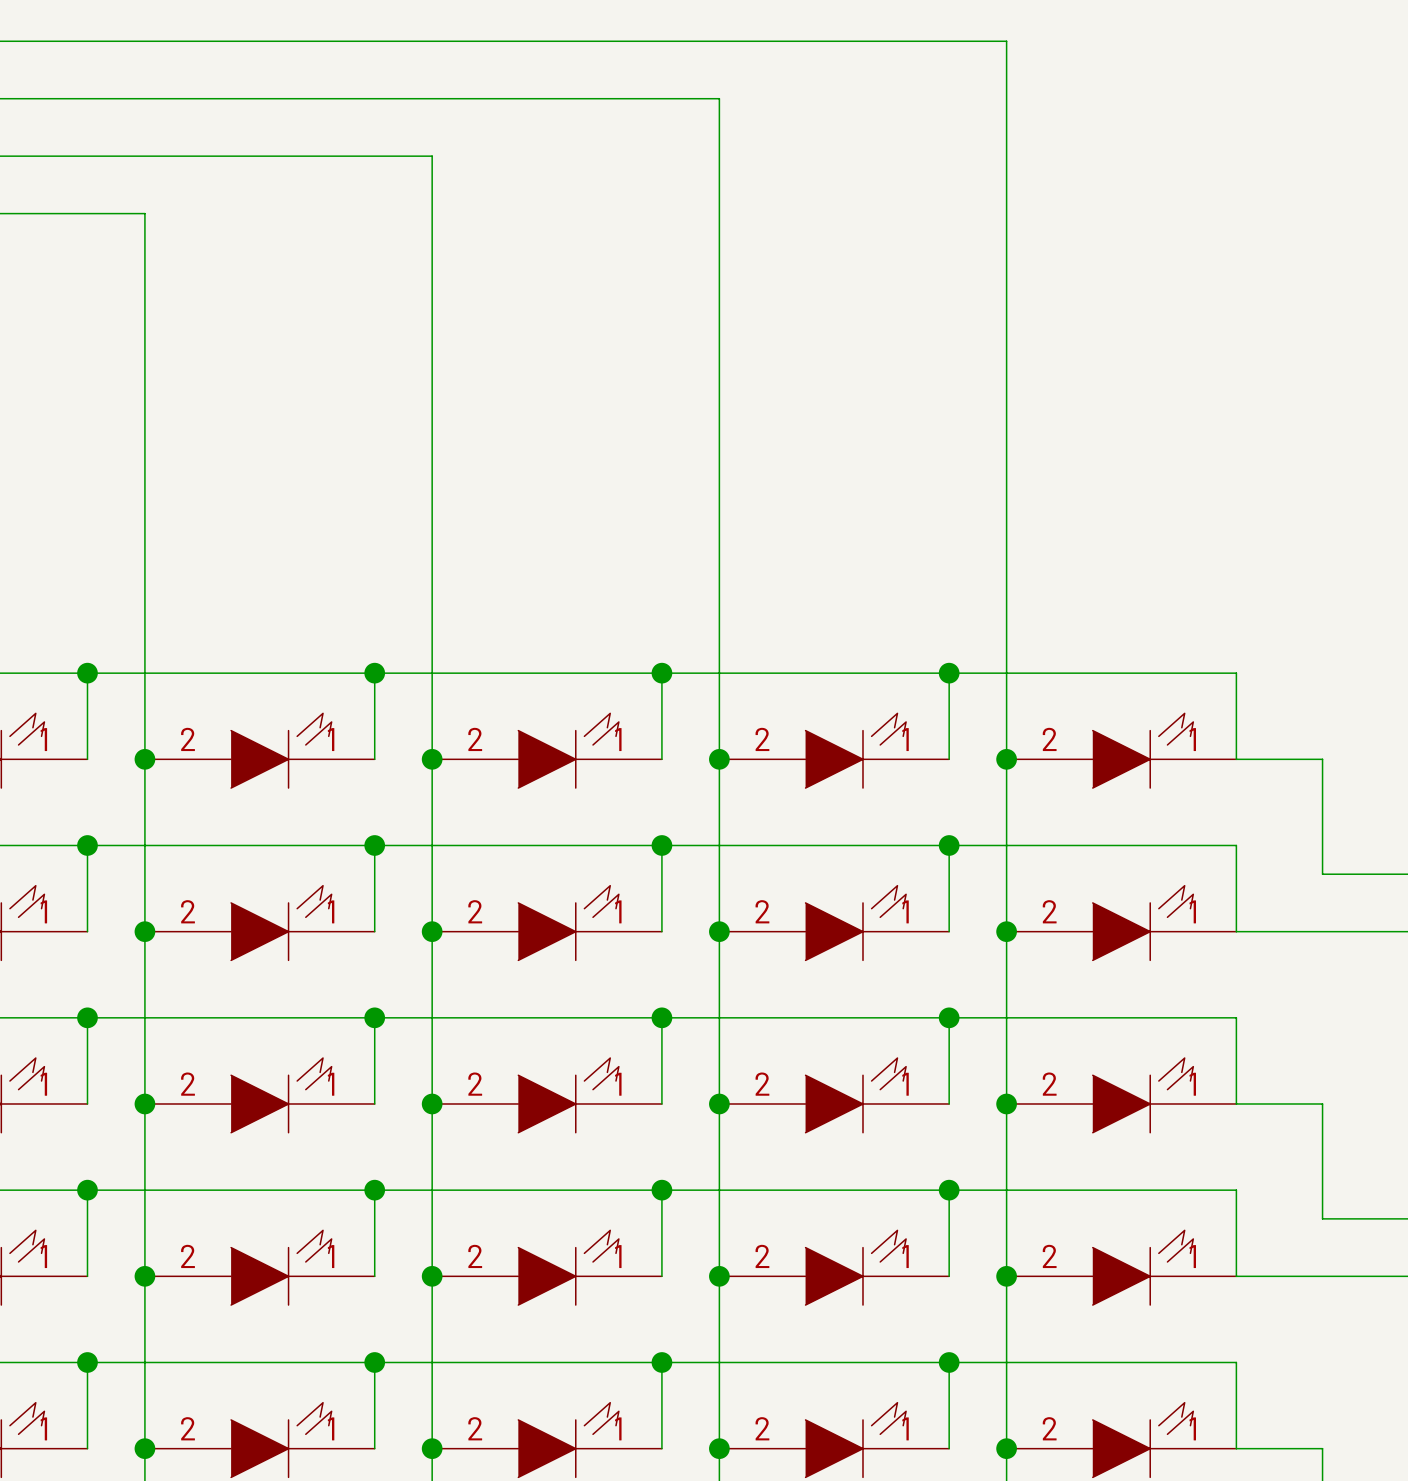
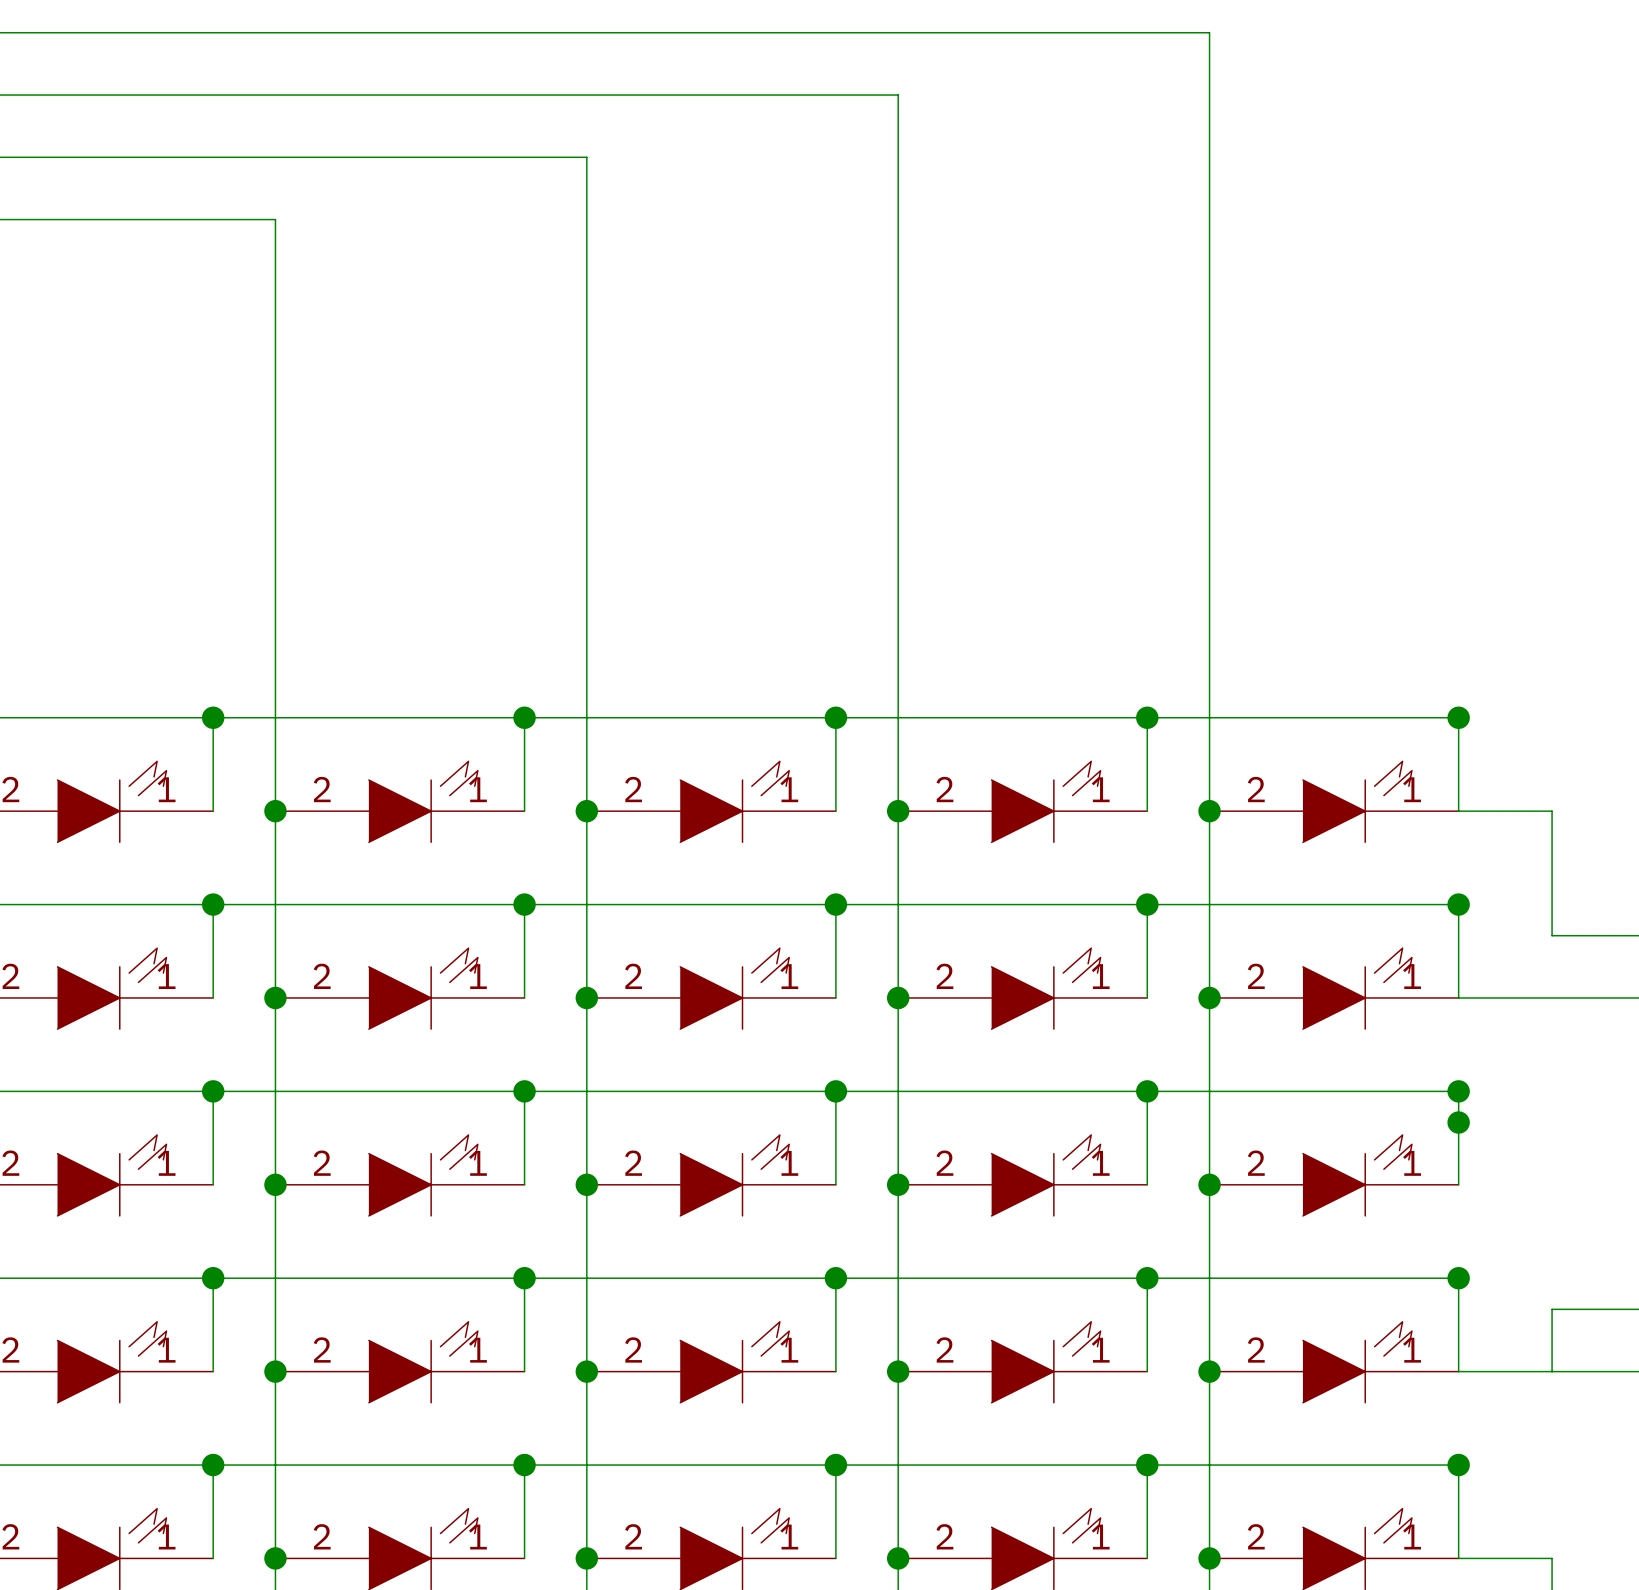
junction: none -> (1458, 717)
junction: none -> (1458, 904)
junction: none -> (1458, 1091)
junction: none -> (1458, 1122)
wire: (1236, 1103) (1322, 1103) (1322, 1218) -> (1552, 1371) (1552, 1309)
junction: none -> (1458, 1278)
junction: none -> (1458, 1465)

